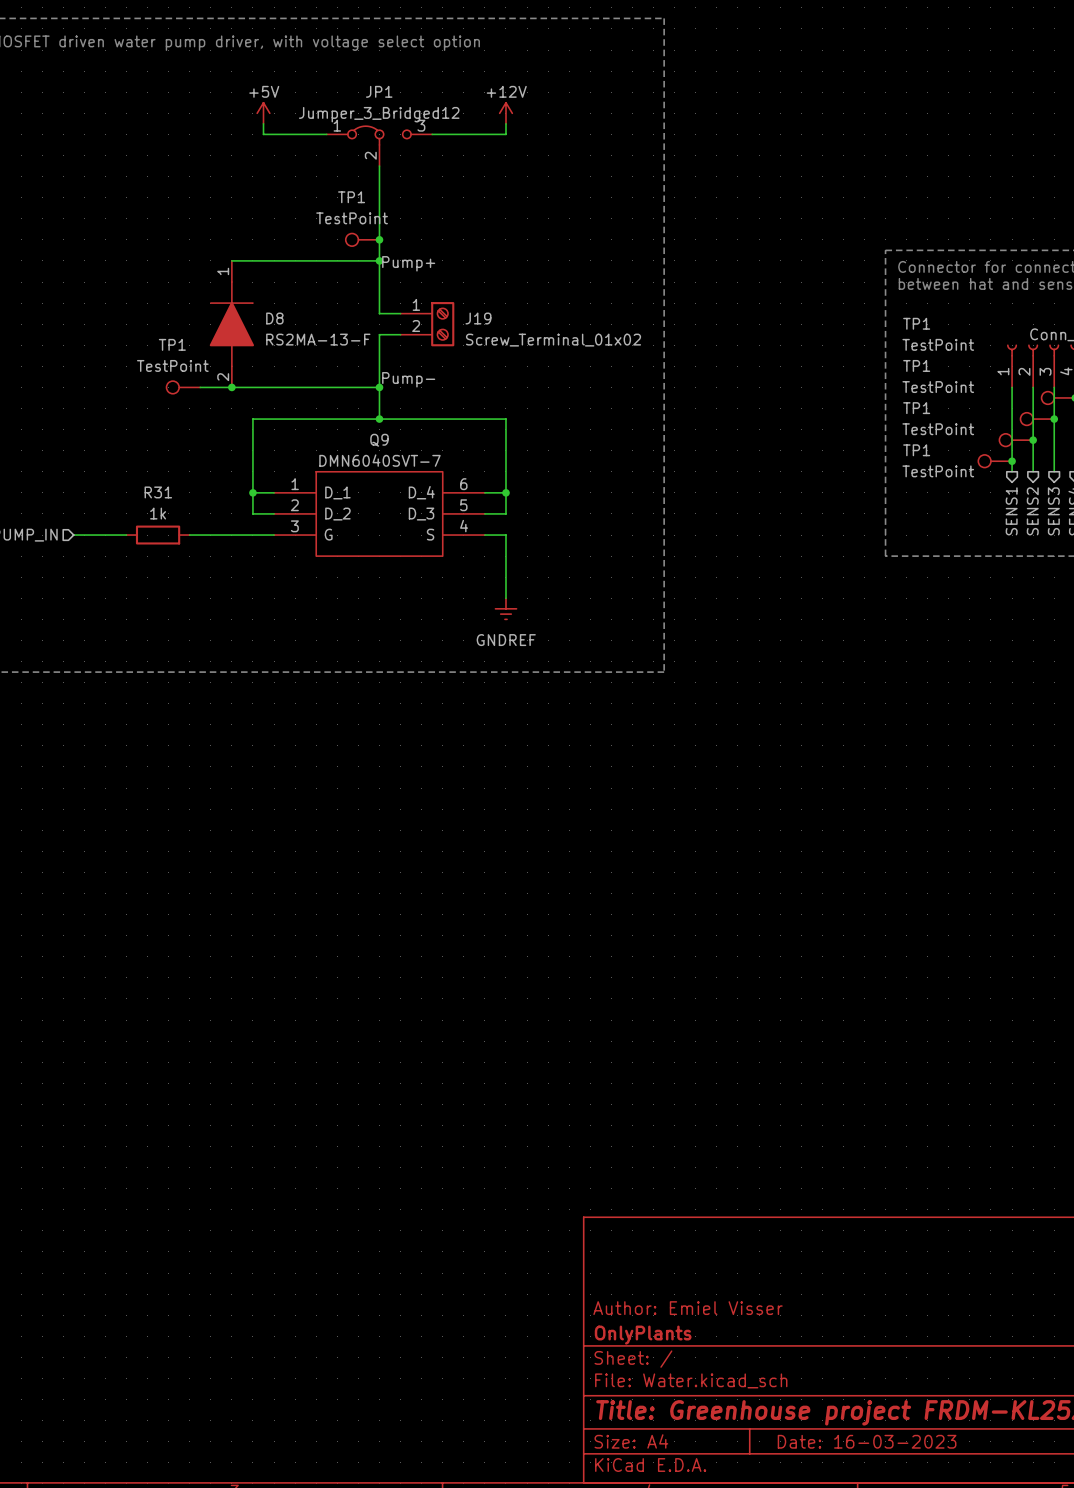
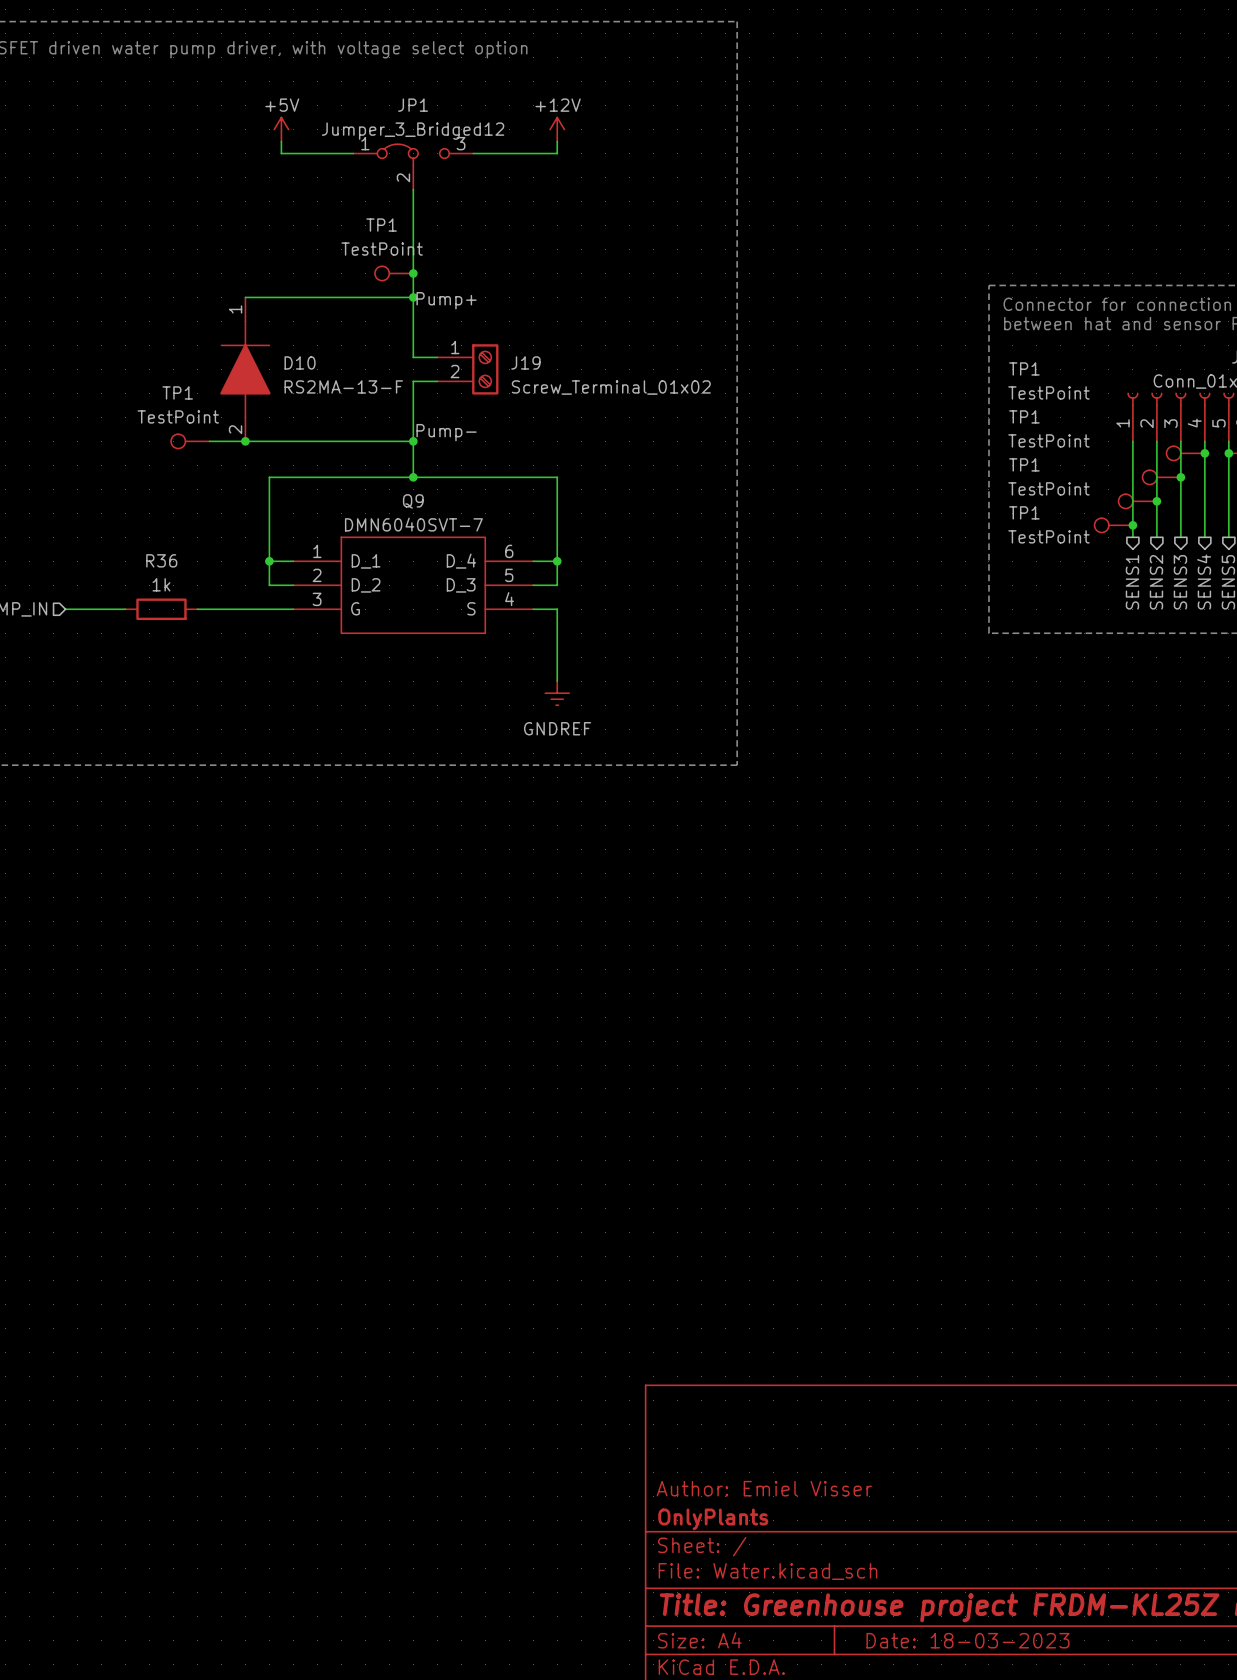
D8 name: D8 (274, 318) -> D10 (300, 362)
R31 name: R31 (158, 492) -> R36 (161, 560)
title block: Date: 16-03-2023 (867, 1441) -> Date: 18-03-2023 (967, 1640)

